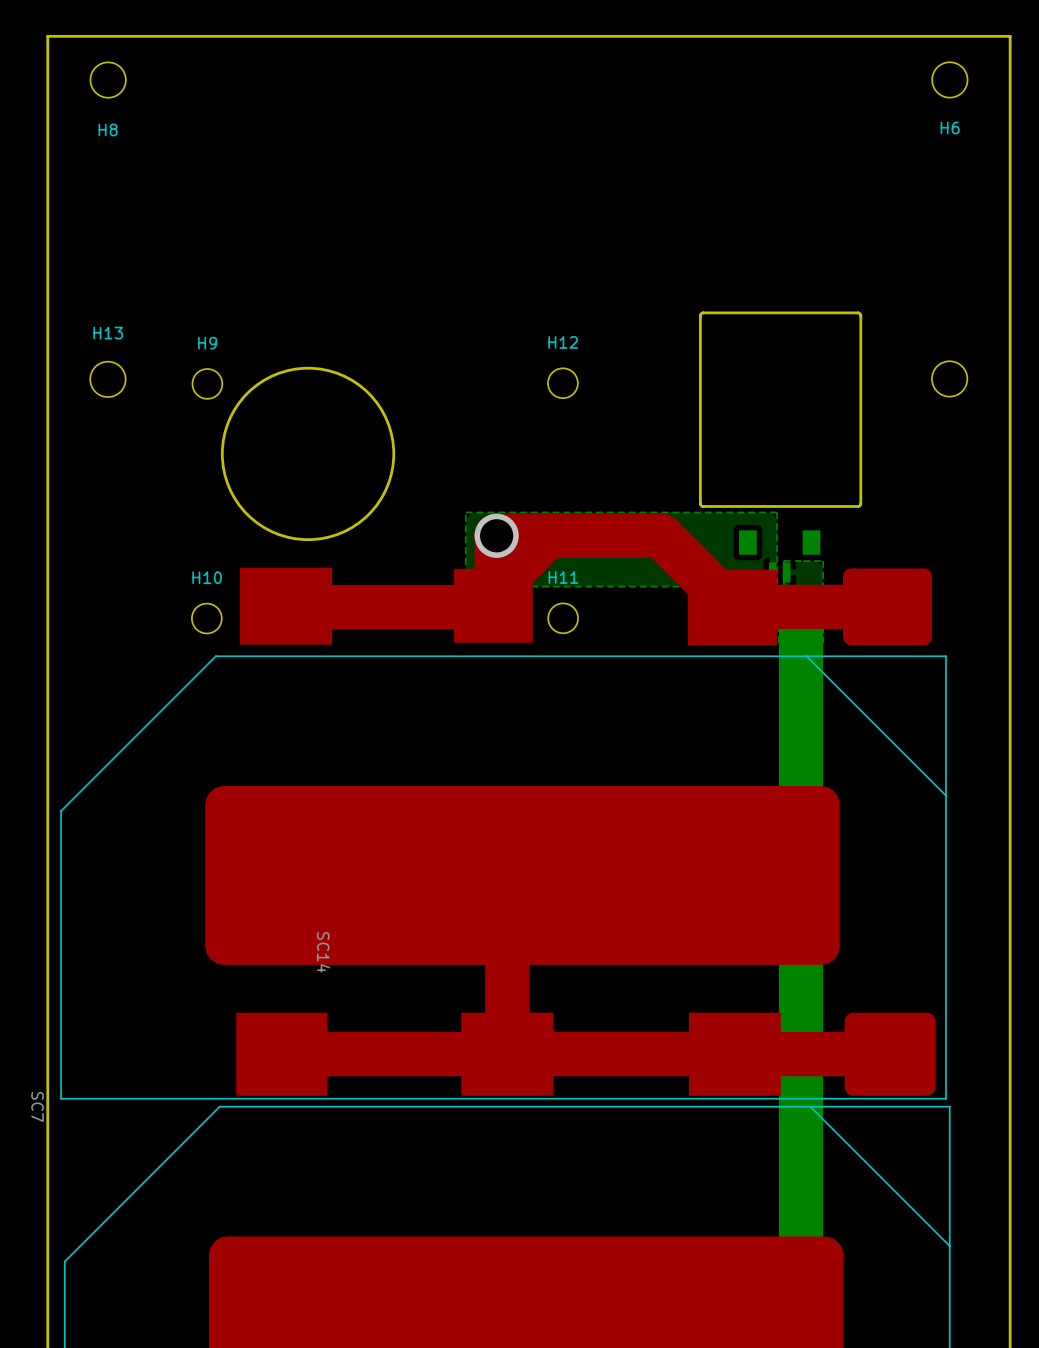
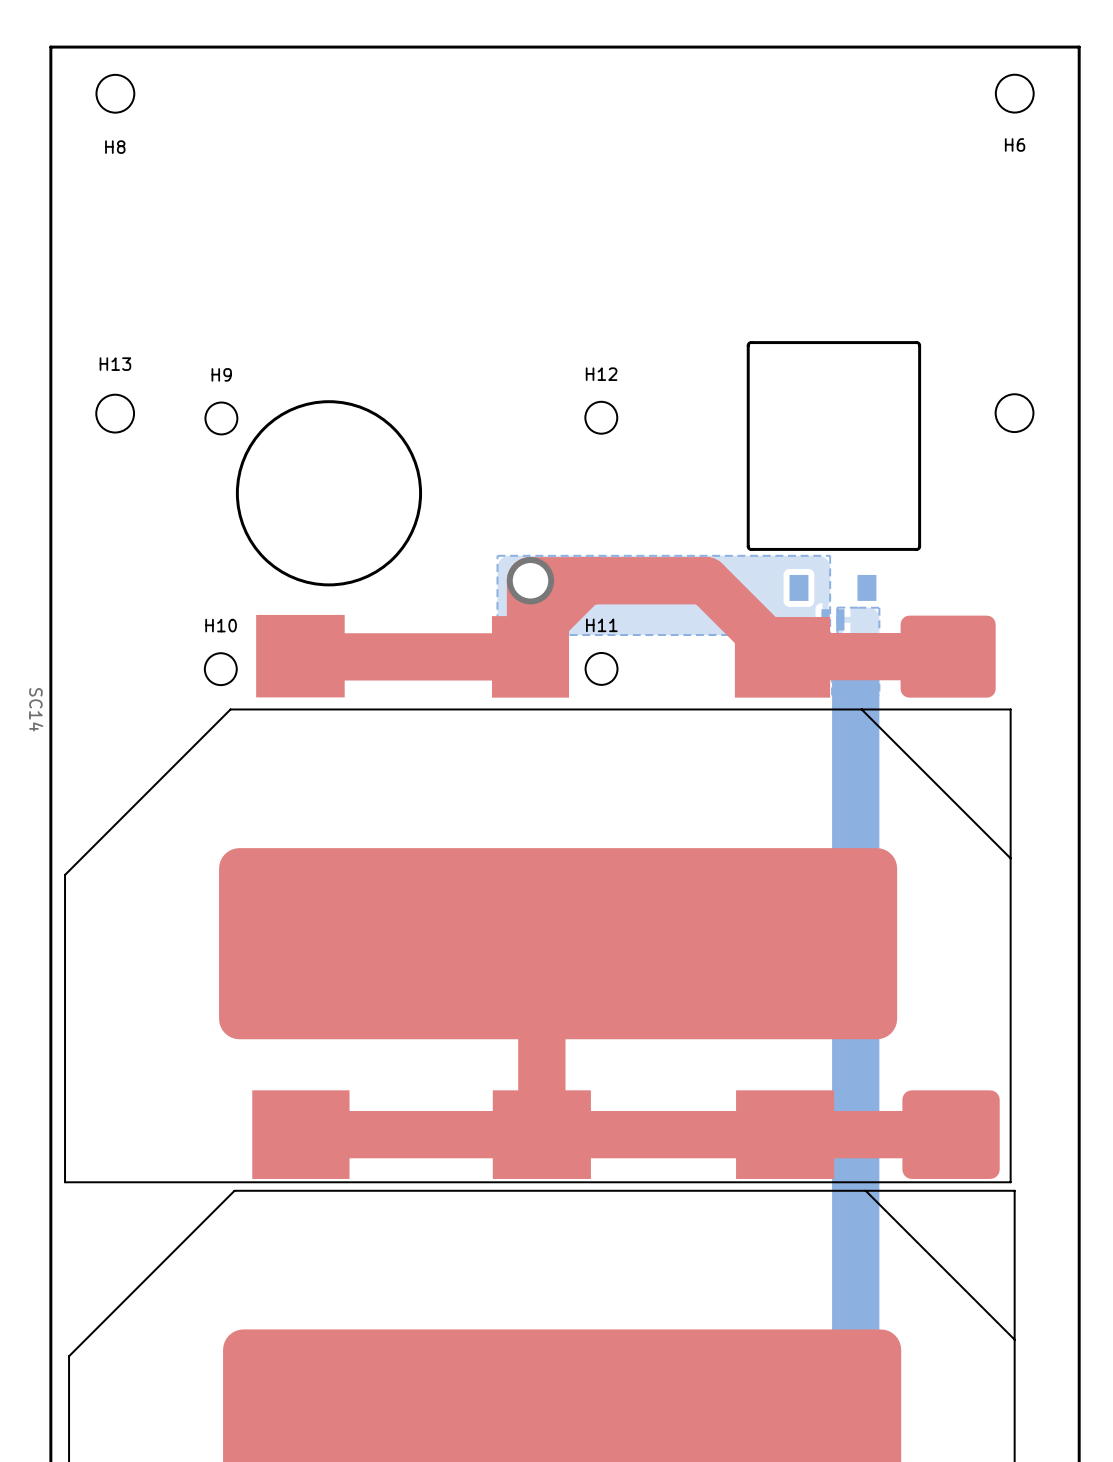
SC14 footprint: [60, 567, 947, 1100] -> [64, 614, 1012, 1183]
SC14 name position: SC14 (323, 952) -> SC14 (36, 709)
SC7 name: SC7 (37, 1106) -> none

